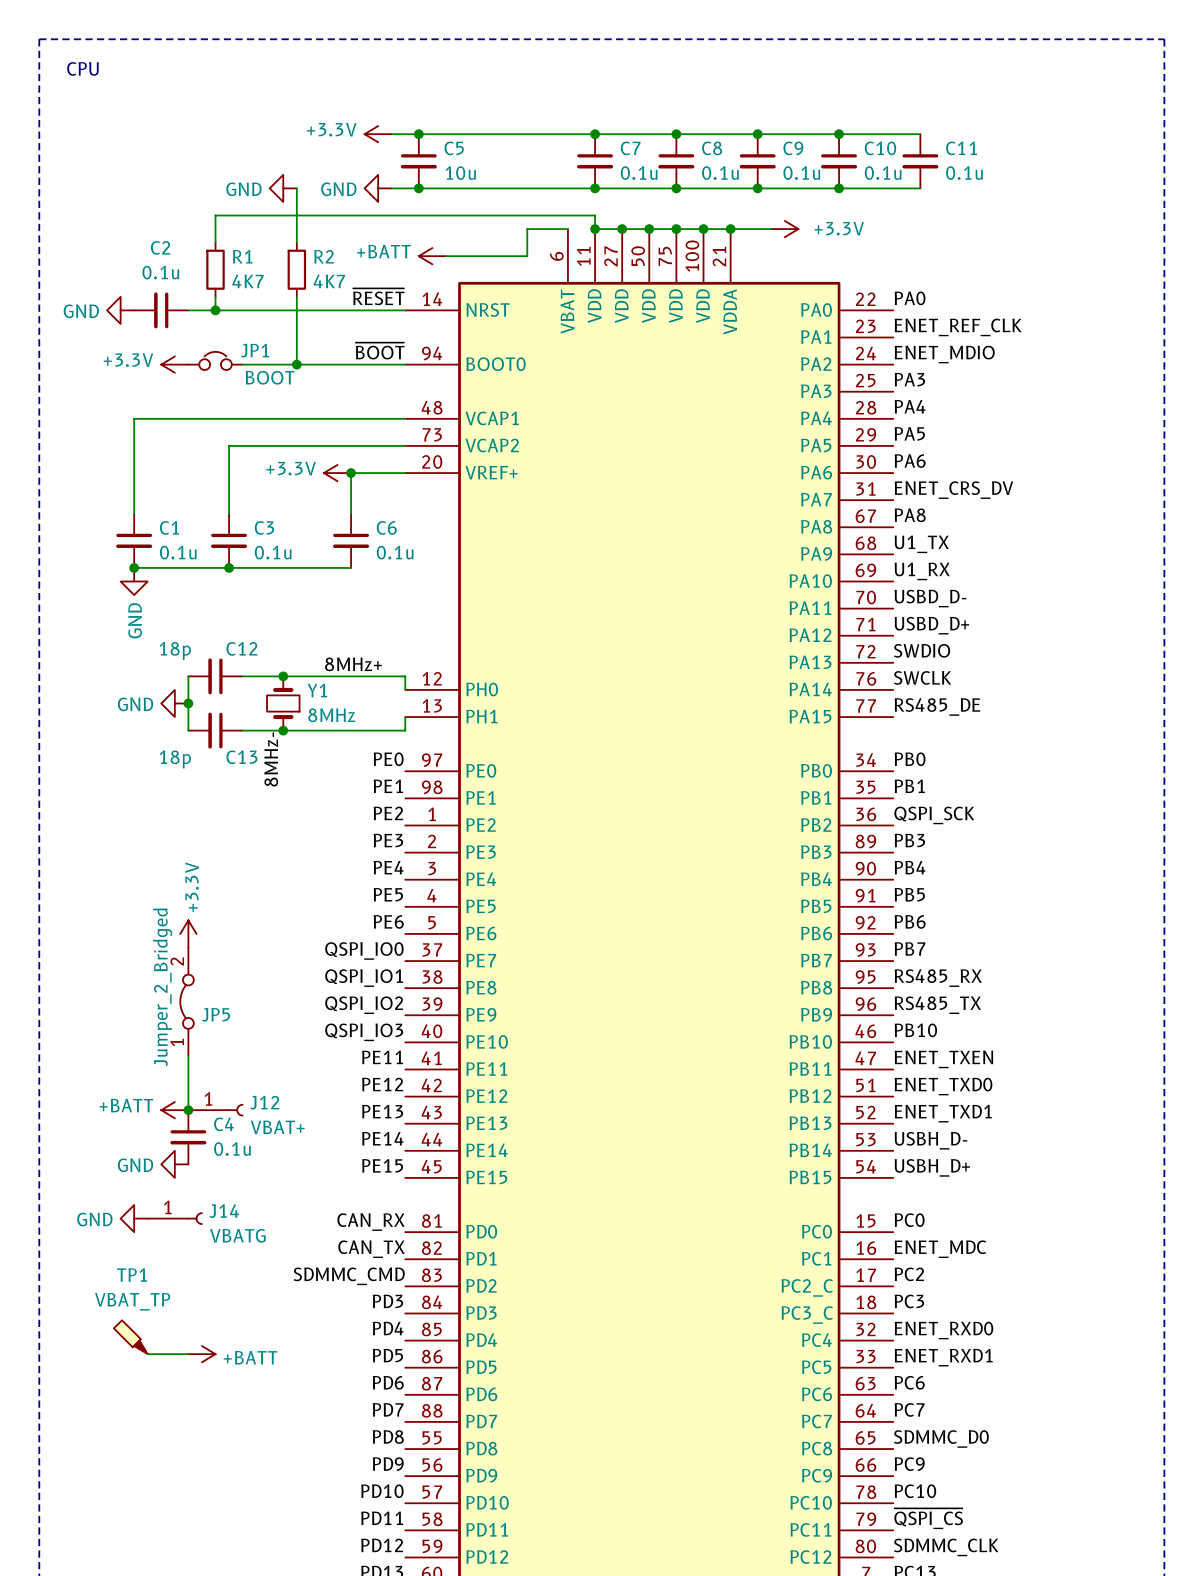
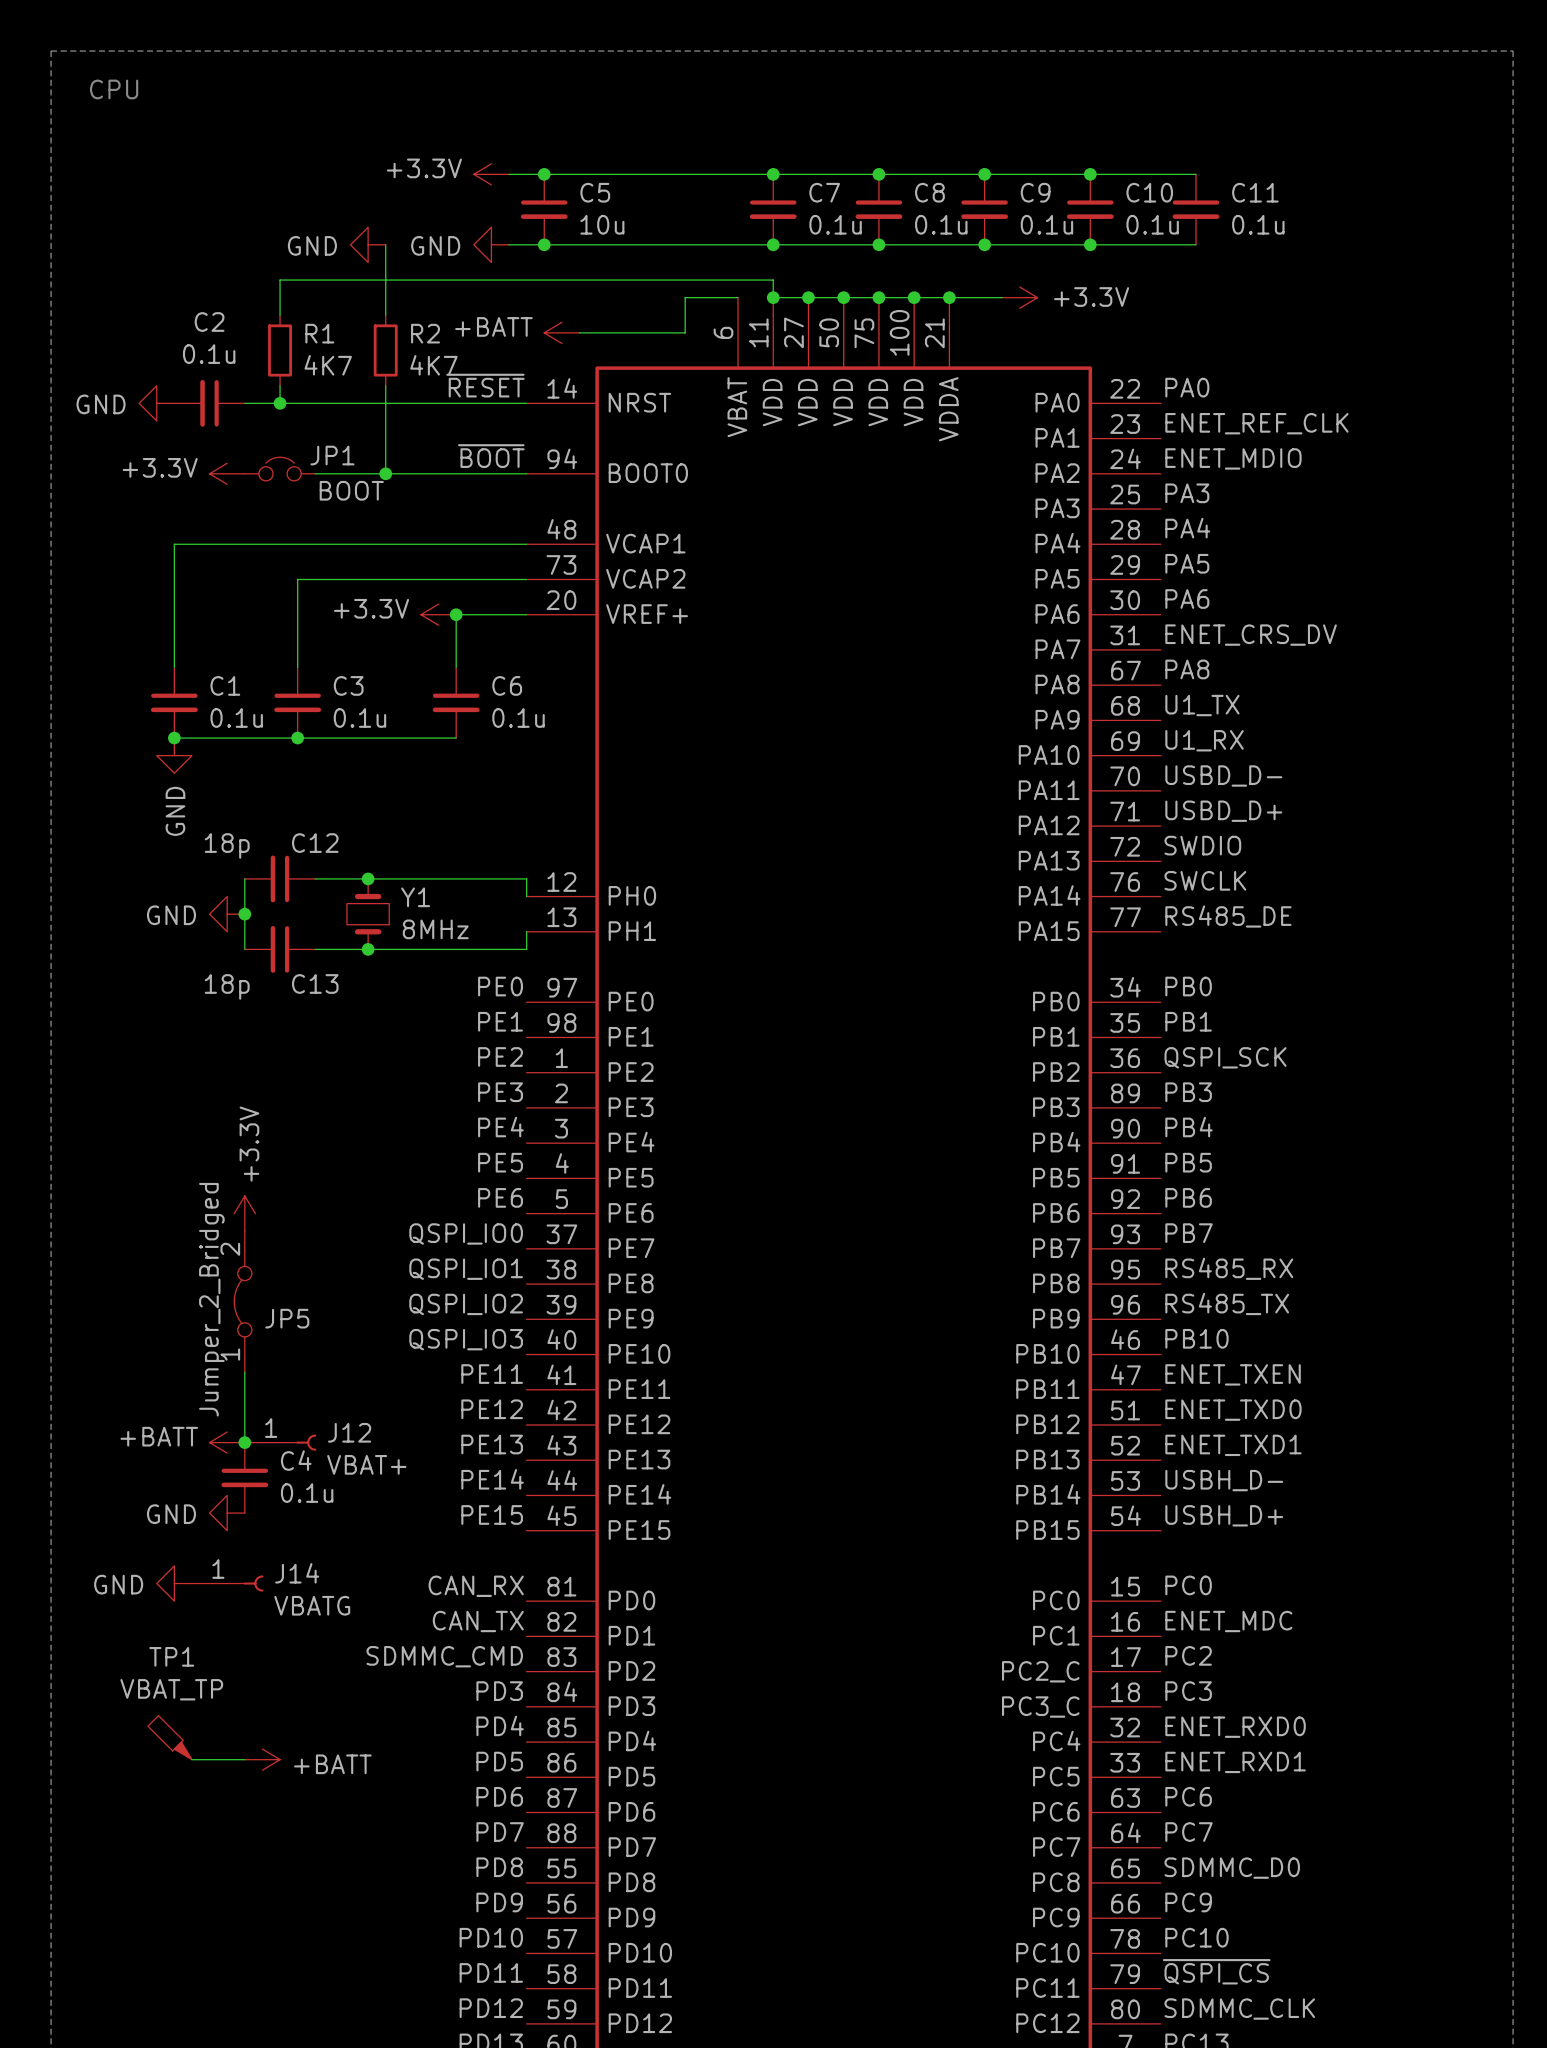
label: 8MHz+ (353, 664) -> none
label: 8MHz- (271, 759) -> none

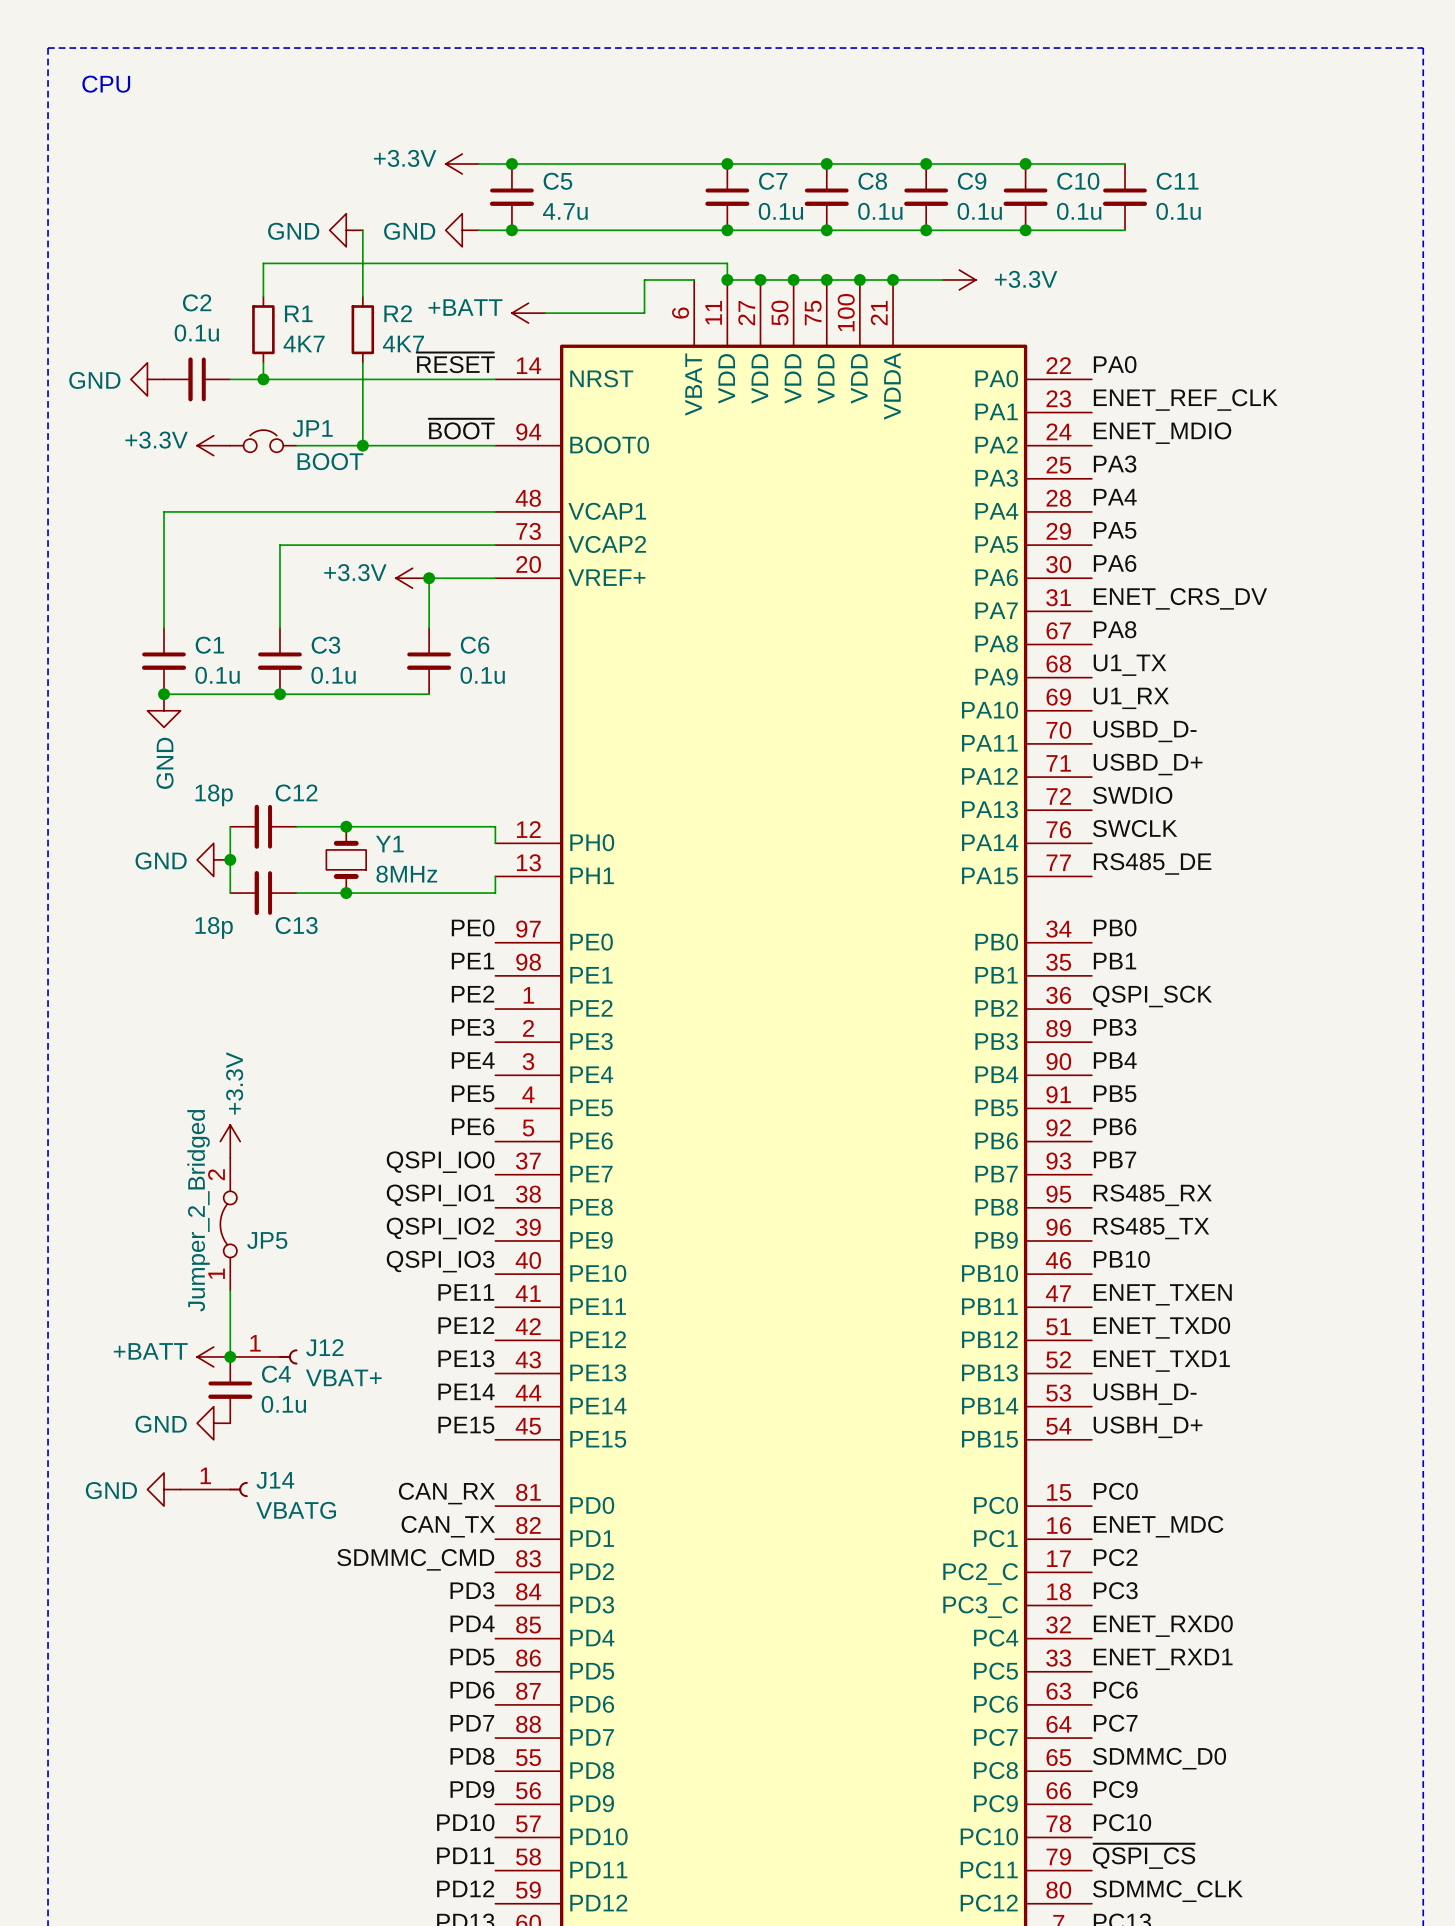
C5 value: 10u (602, 224) -> 4.7u (565, 211)
TP1: VBAT_TP (169, 1737) -> none
wire: (191, 1759) (244, 1759) -> none
power symbol: +BATT (262, 1759) -> none

